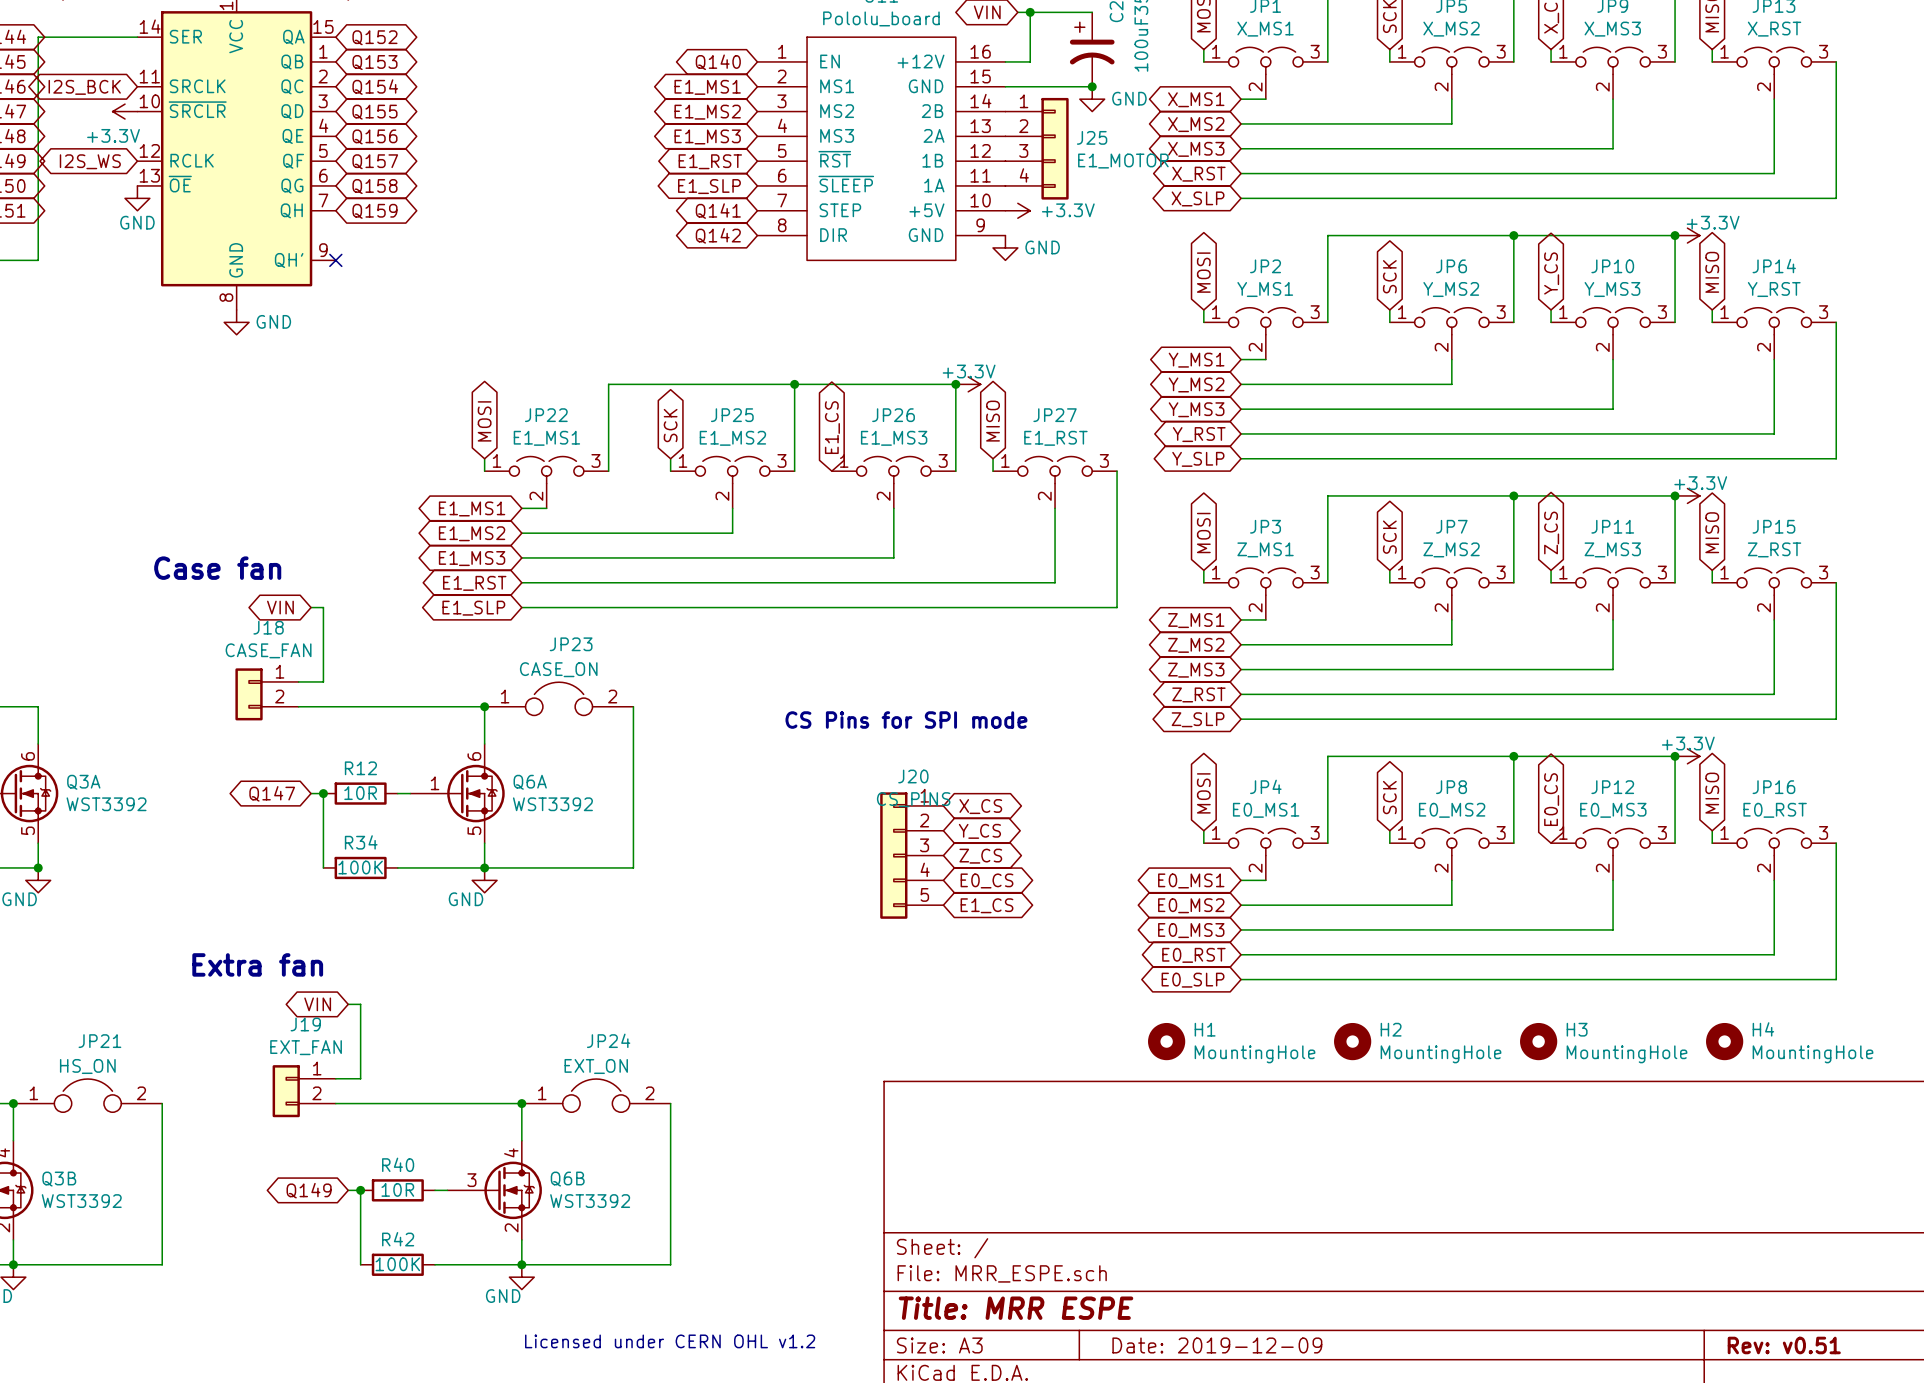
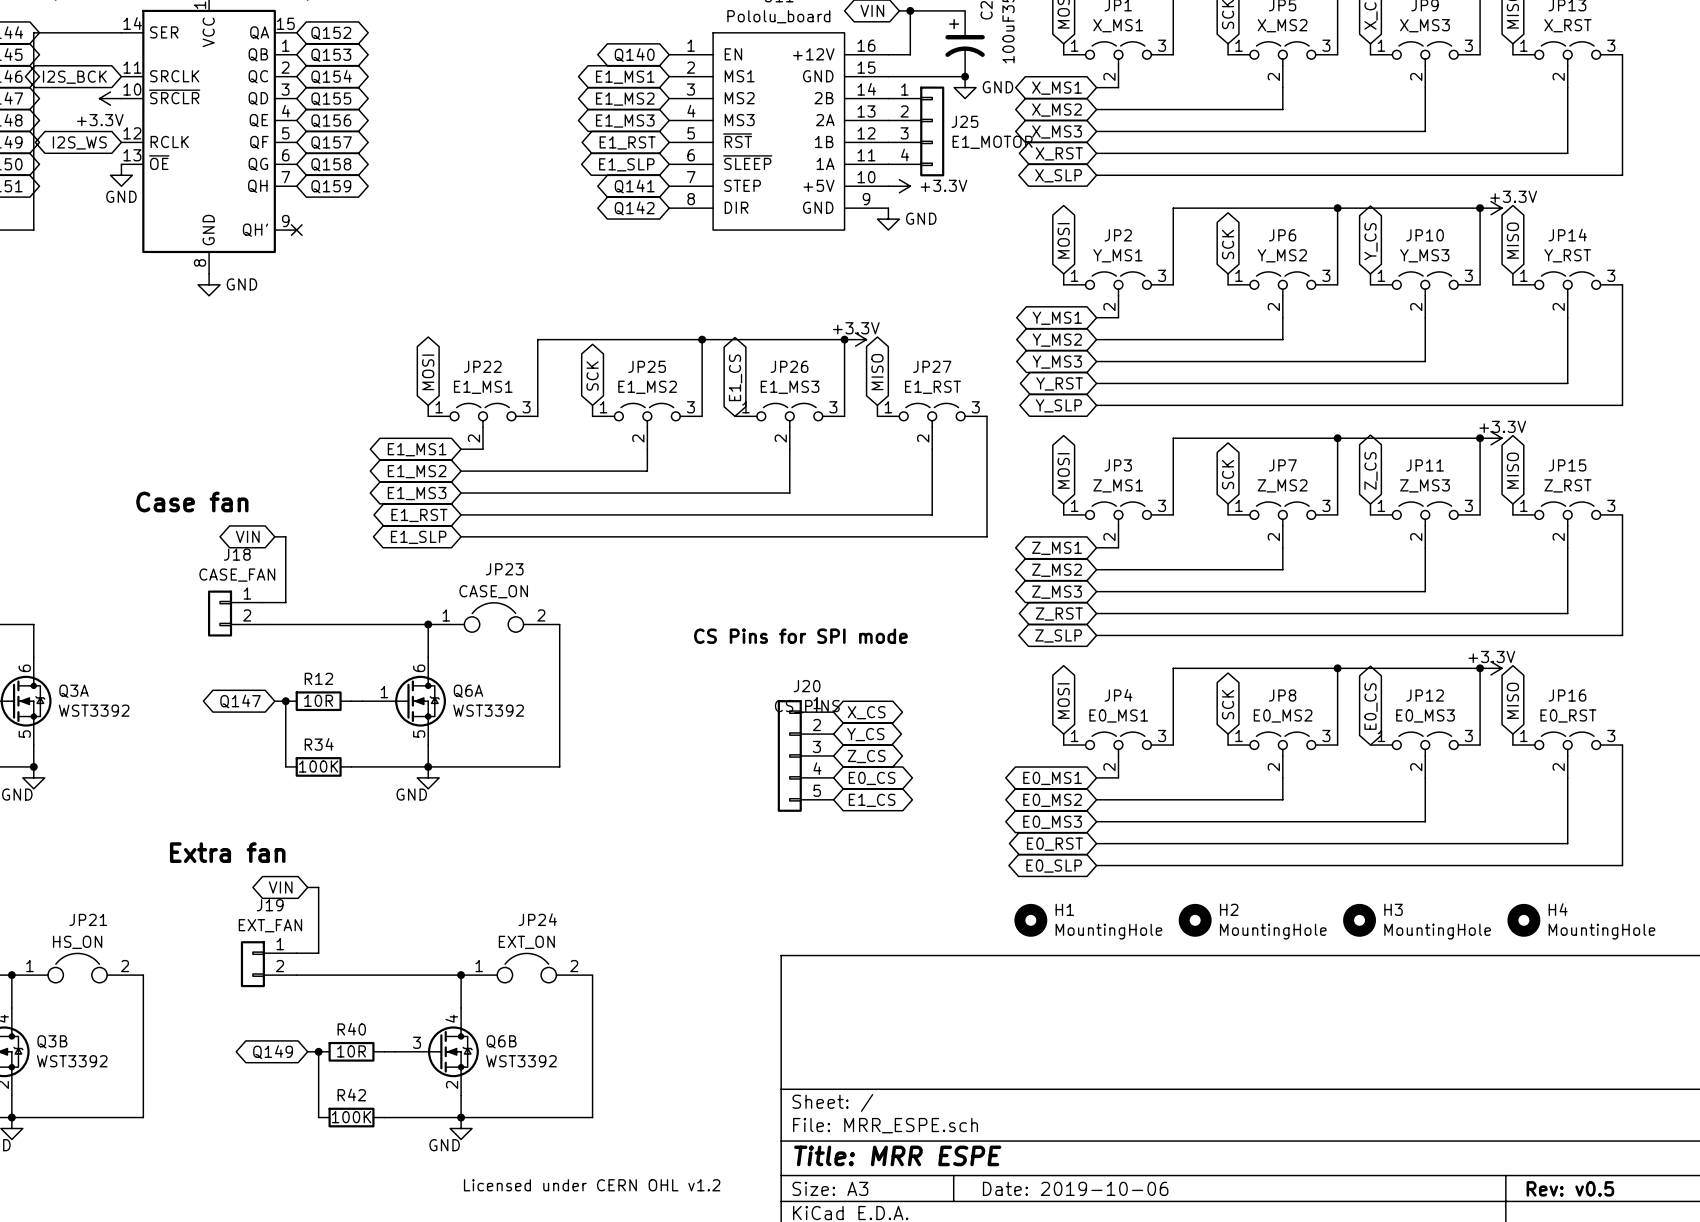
title block: Date: 2019-12-09 (1217, 1345) -> Date: 2019-10-06 (1075, 1188)
title block: Rev: v0.51 (1784, 1345) -> Rev: v0.5 (1570, 1188)

